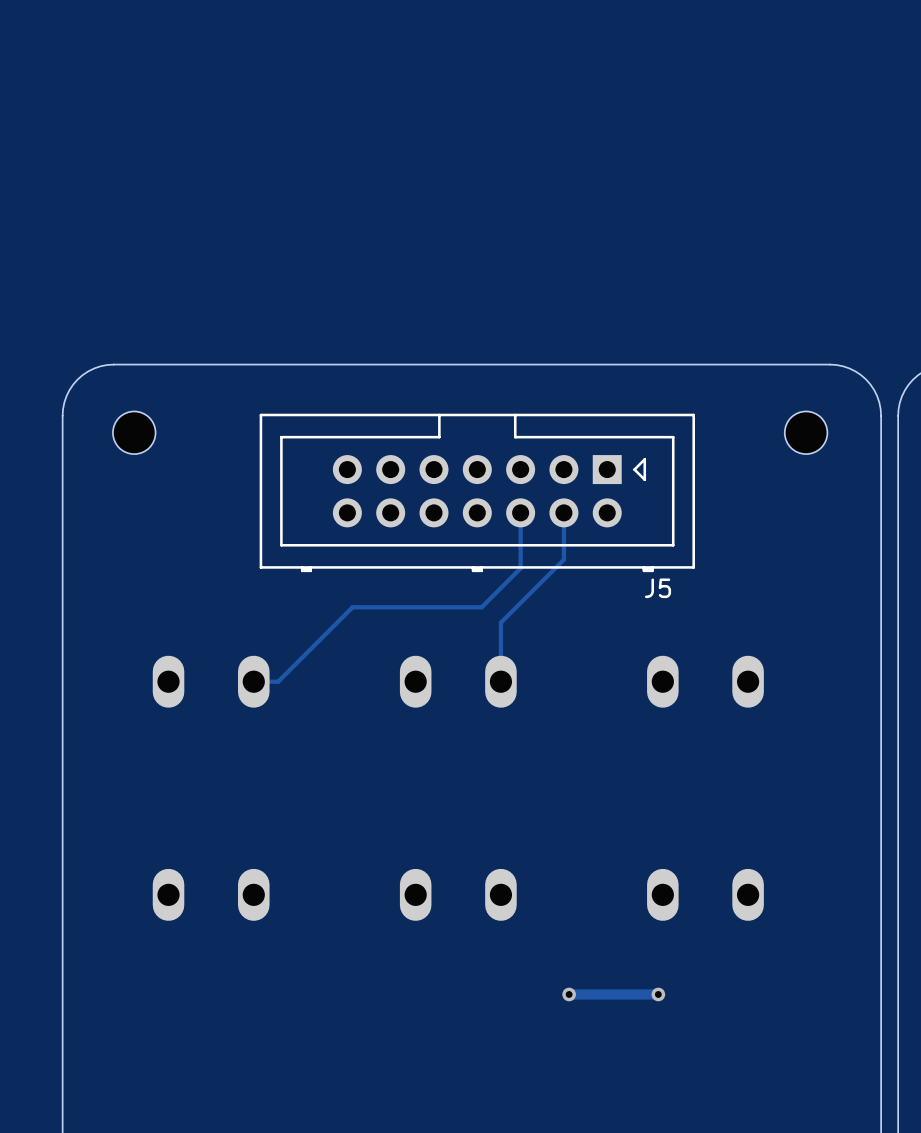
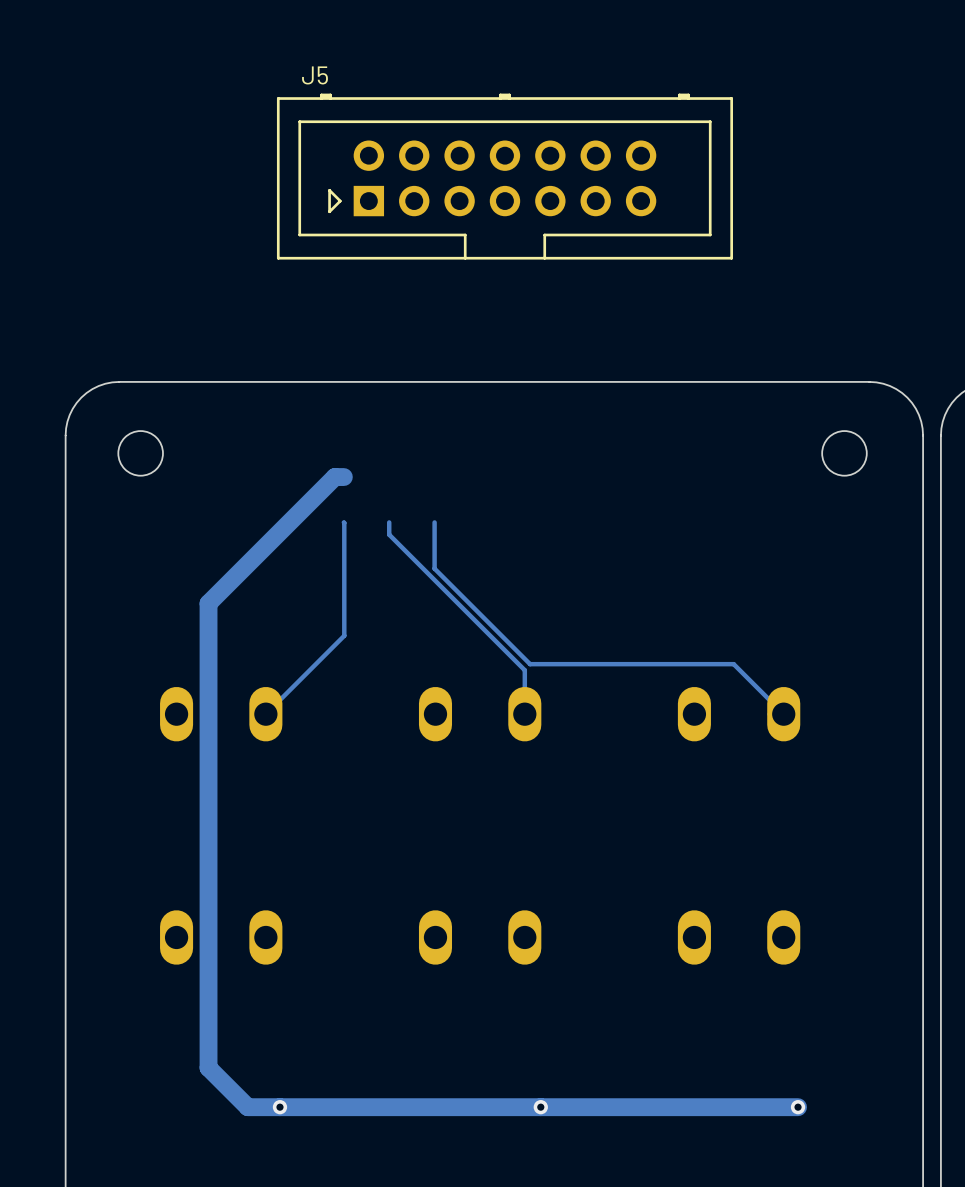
track: none -> (343, 477) (334, 477) (208, 603) (208, 1067) (247, 1107) (798, 1107)
J5 rotation: 0° (477, 492) -> 180° (504, 176)
J5 position: (477, 492) -> (504, 176)
track: none -> (434, 522) (434, 568) (530, 664) (733, 664) (783, 714)
track: (520, 512) (520, 568) (481, 607) (352, 607) (278, 681) (253, 681) -> (343, 522) (344, 635) (265, 714)
track: (563, 512) (563, 559) (500, 622) (500, 681) -> (389, 522) (389, 534) (524, 670) (524, 714)
via: (569, 994) -> none
track: (658, 994) (569, 994) -> none
via: (658, 994) -> none
via: none -> (279, 1107)
via: none -> (540, 1107)
via: none -> (798, 1107)

